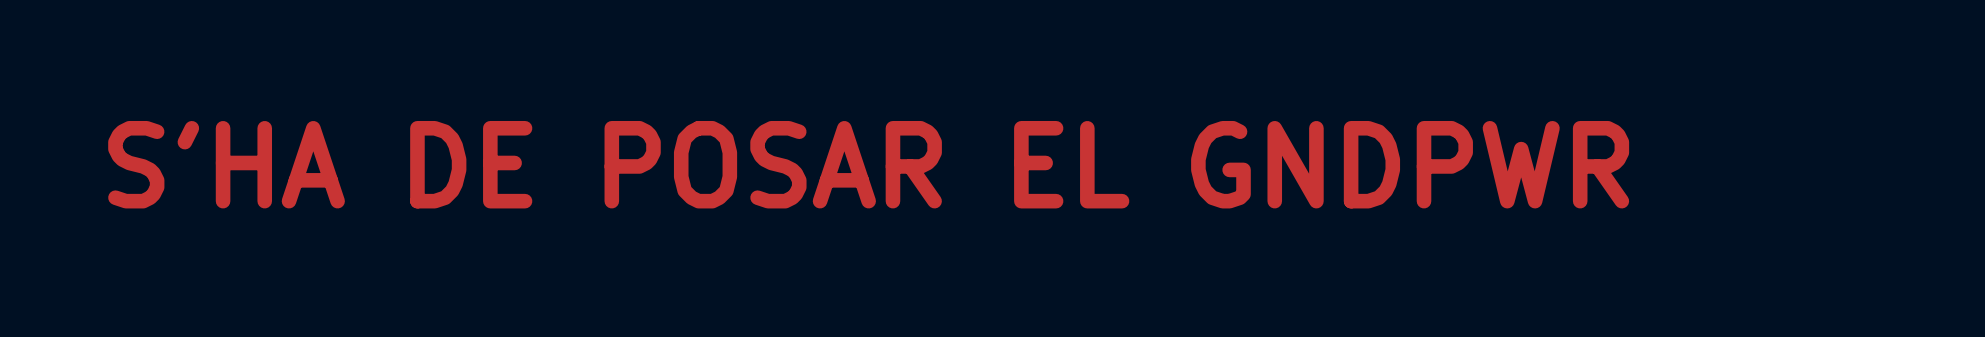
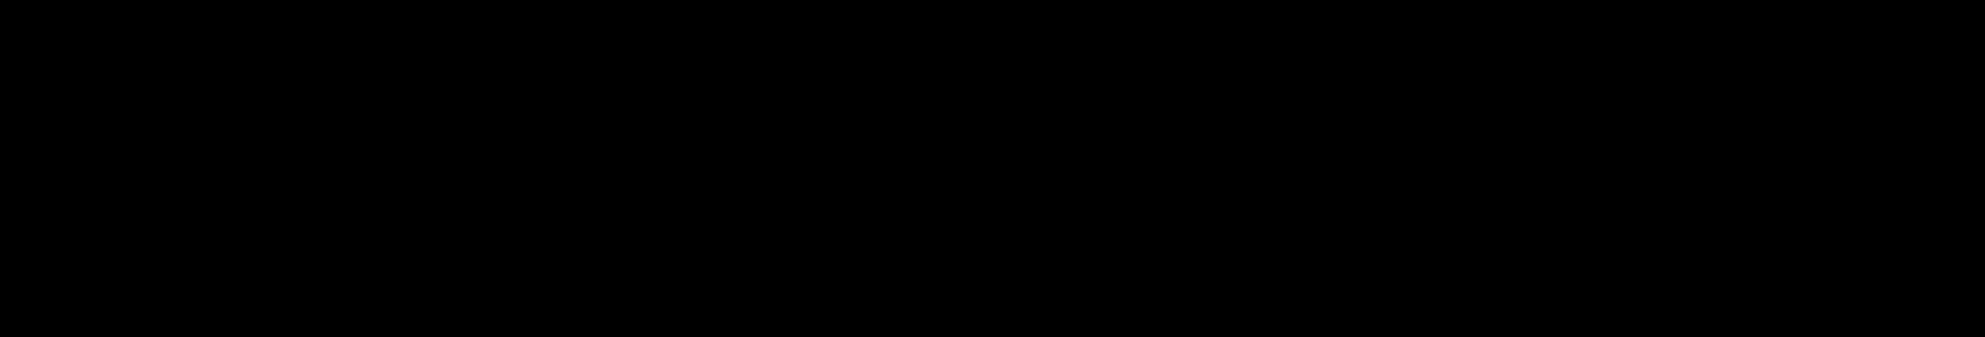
text: S'HA DE POSAR EL GNDPWR (868, 164) -> none

